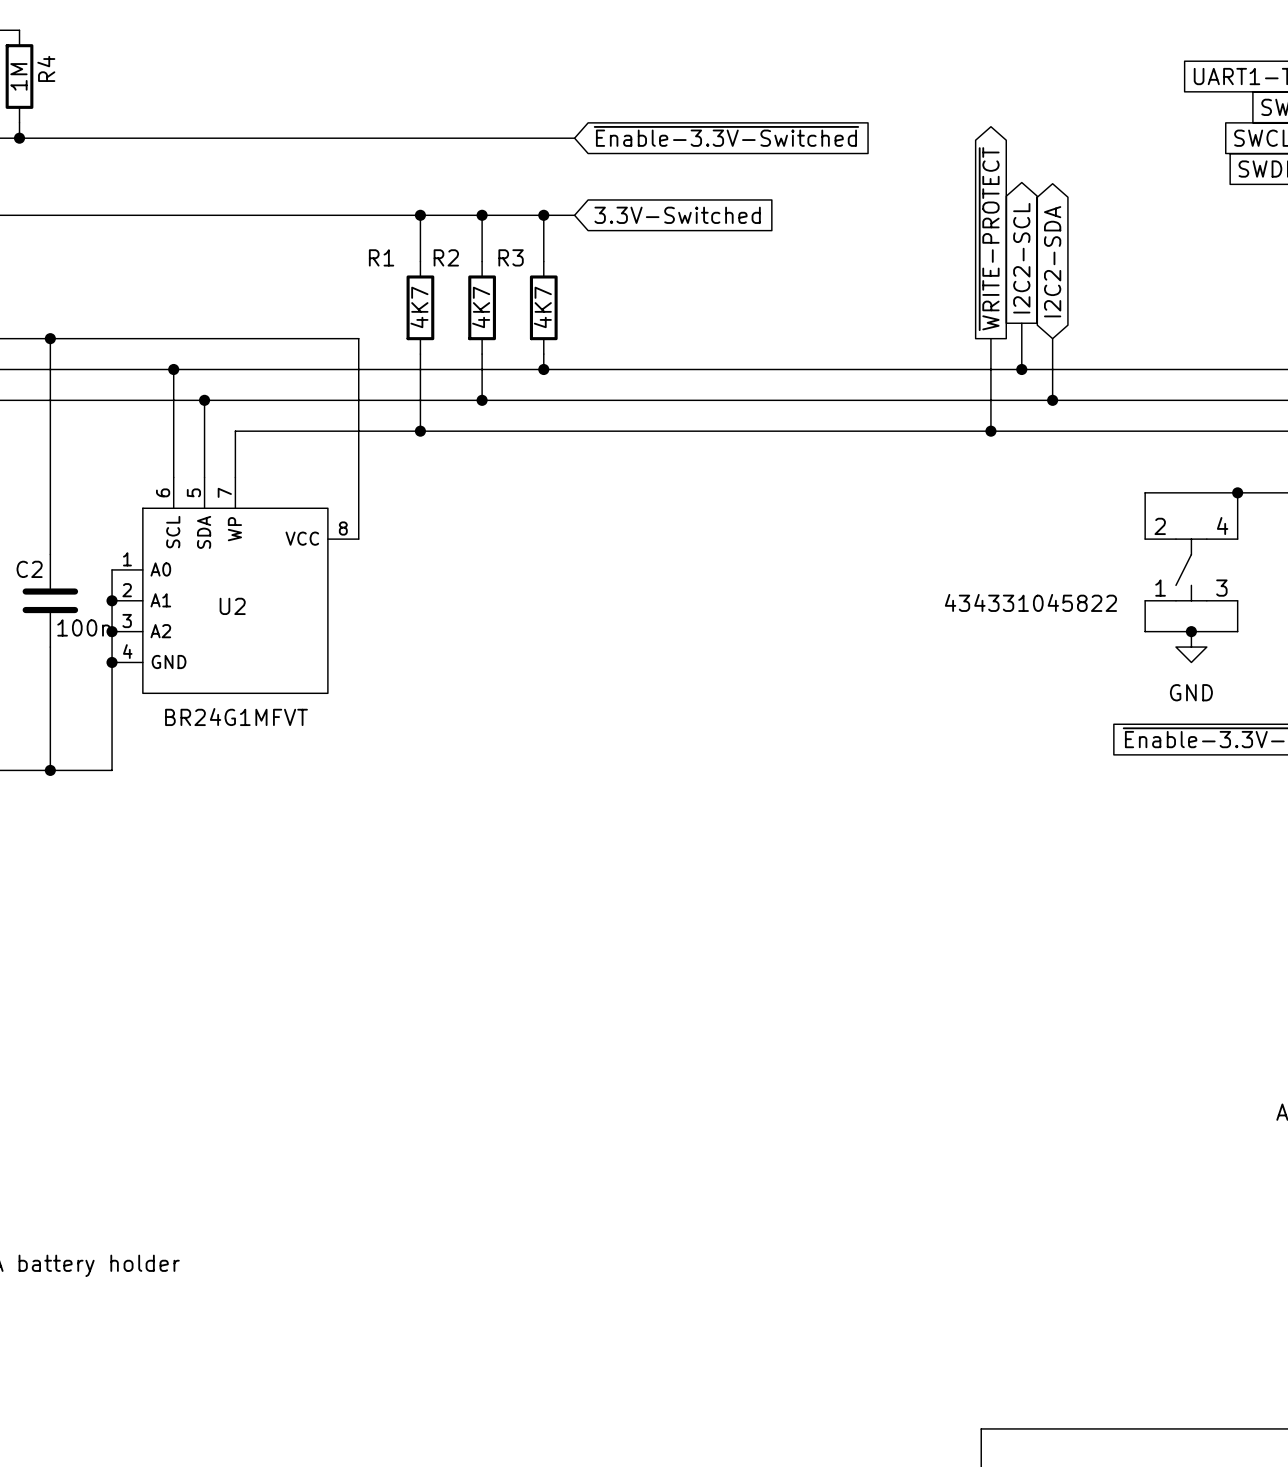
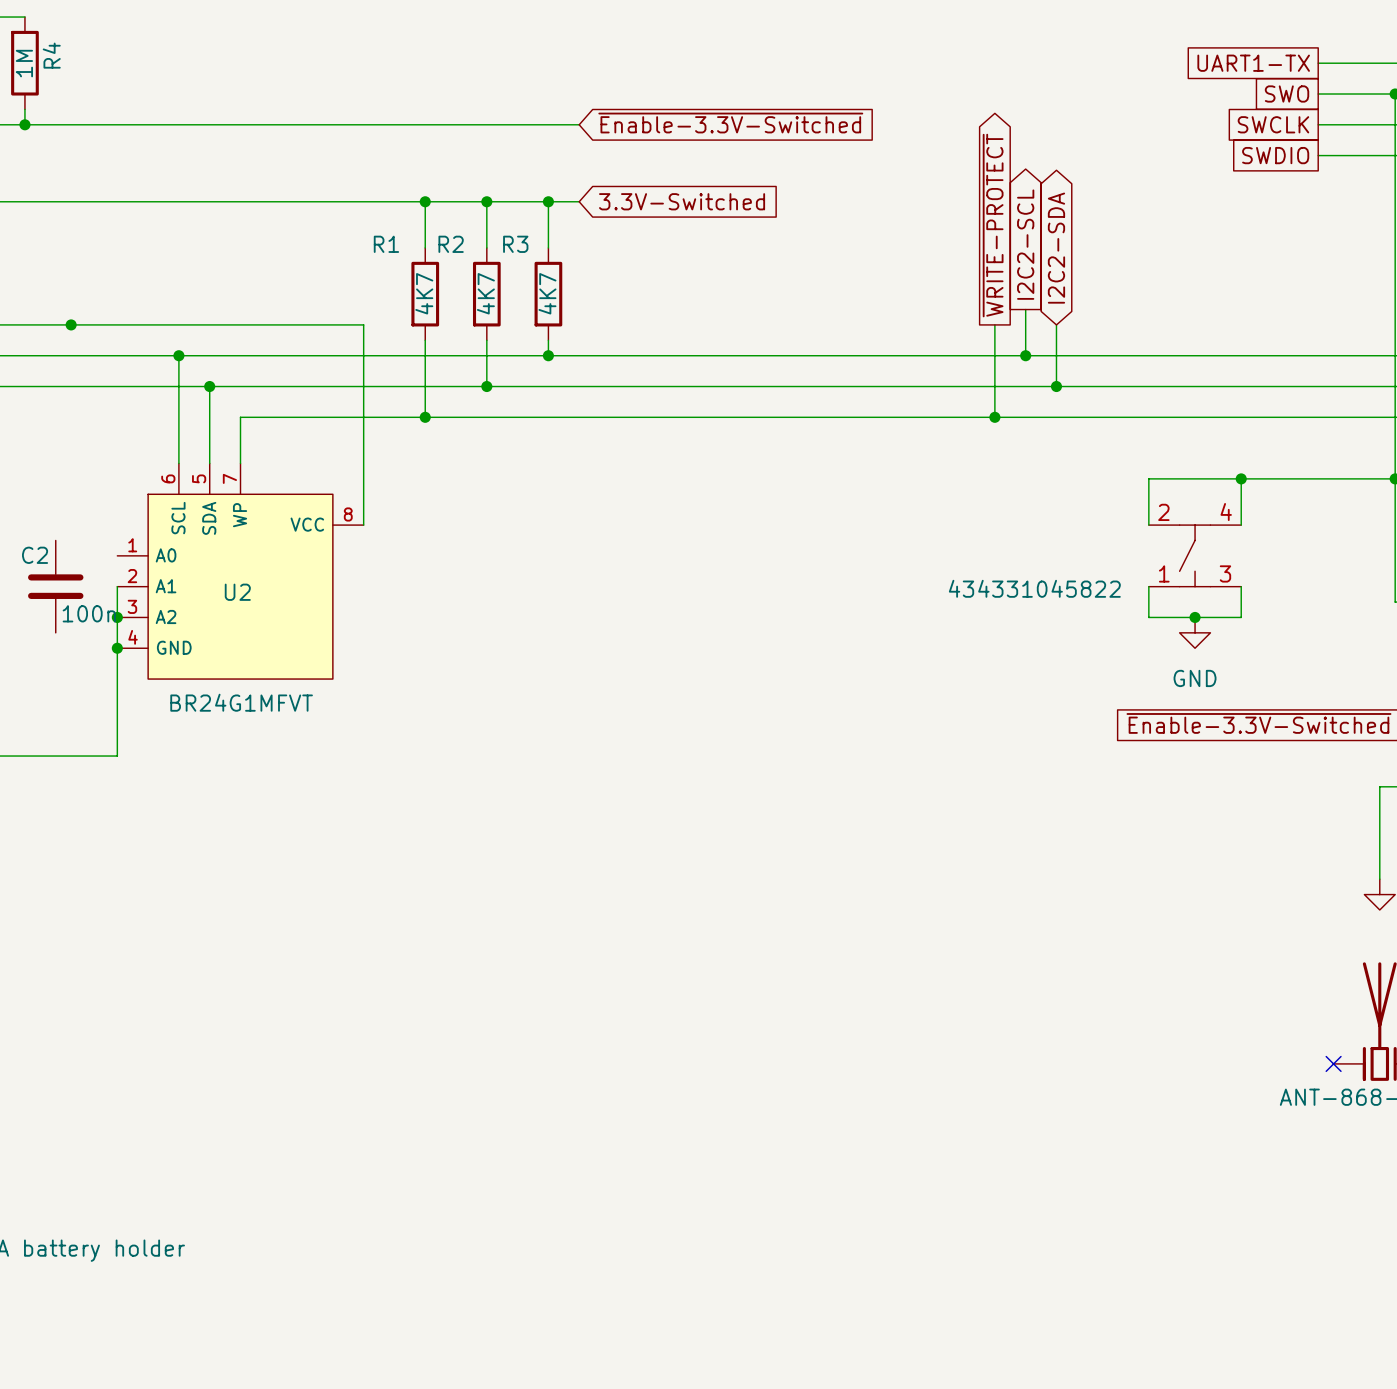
wire: (50, 338) (50, 554) -> none
junction position: (50, 338) -> (71, 324)
wire: (112, 569) (112, 600) -> none
junction: (112, 600) -> none
wire: (50, 647) (50, 770) -> none
junction: (50, 770) -> none

